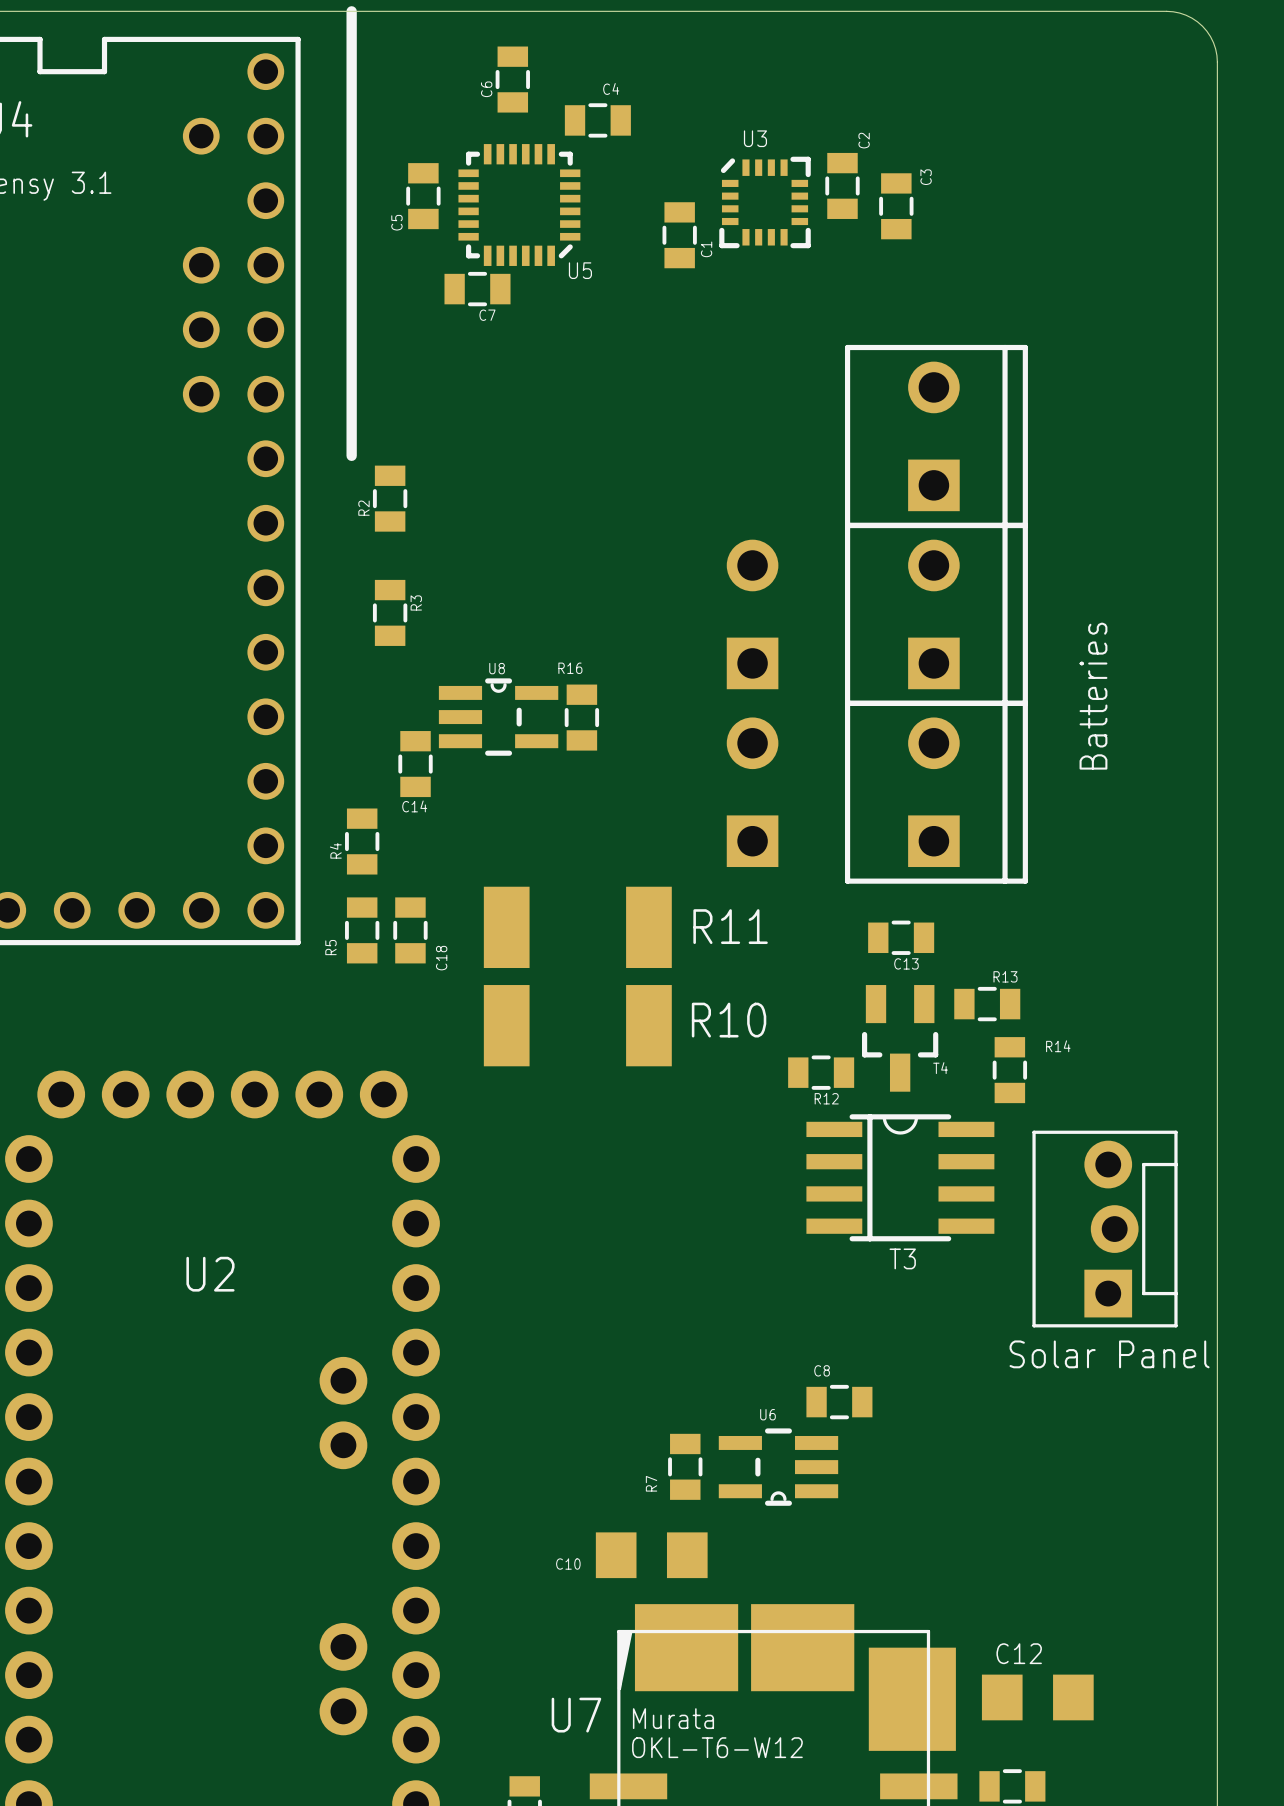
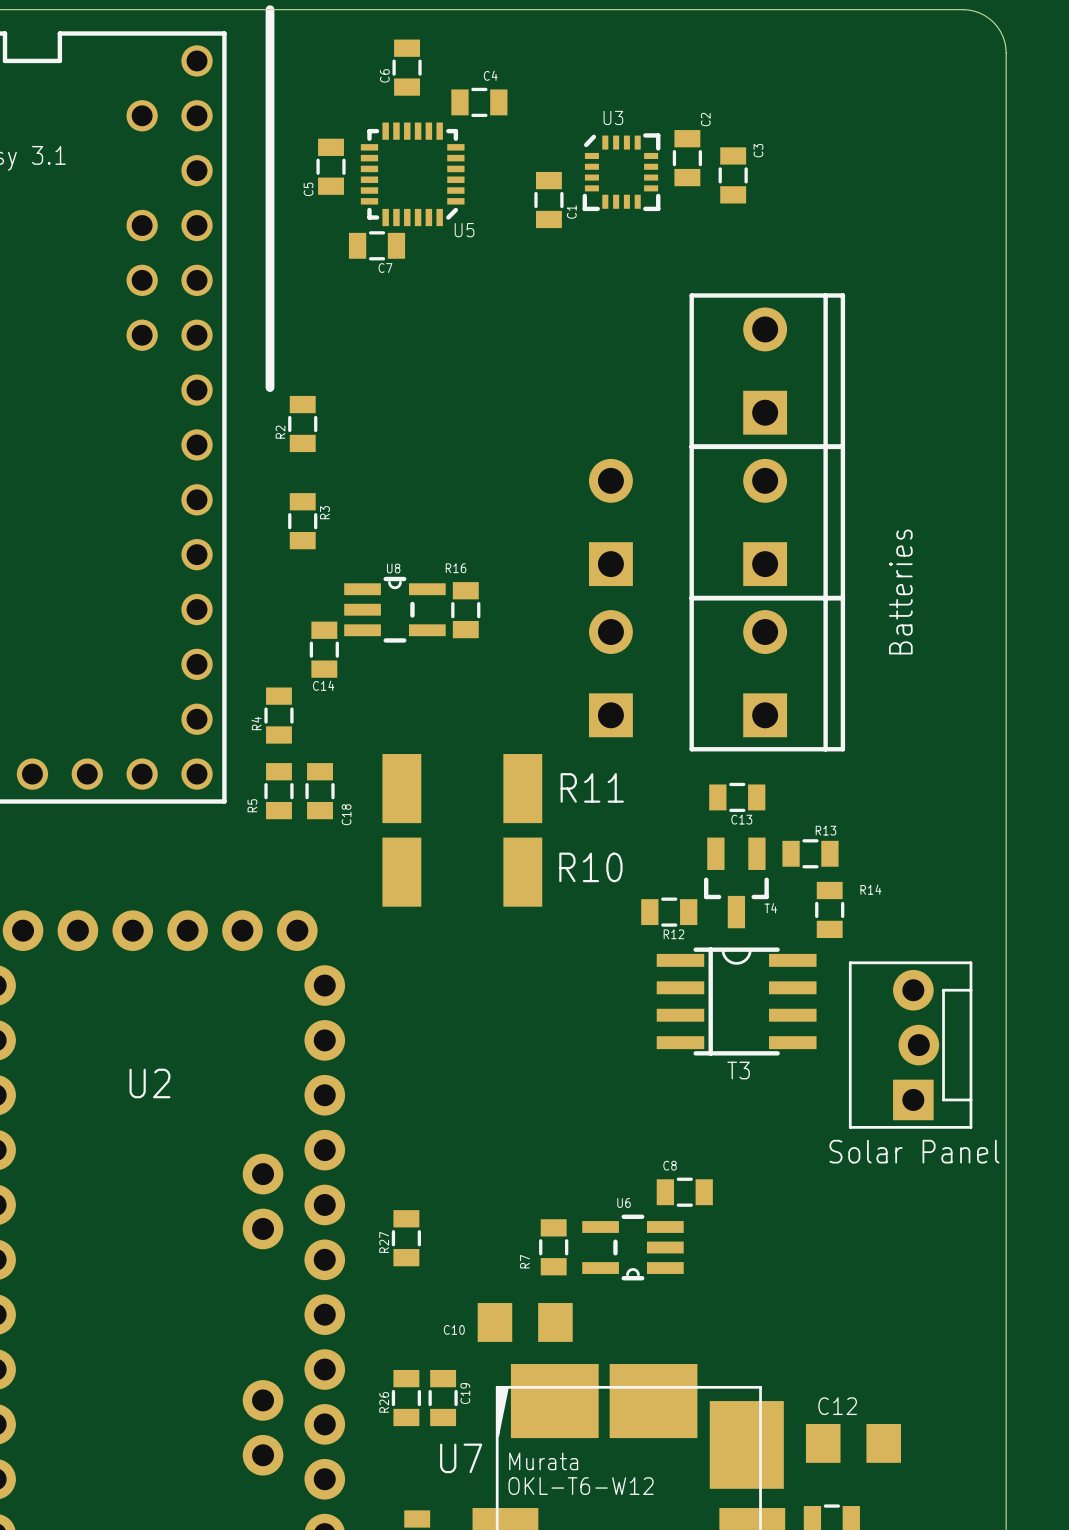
R27: none -> (406, 1238)
R26: none -> (406, 1398)
C19: none -> (443, 1398)

